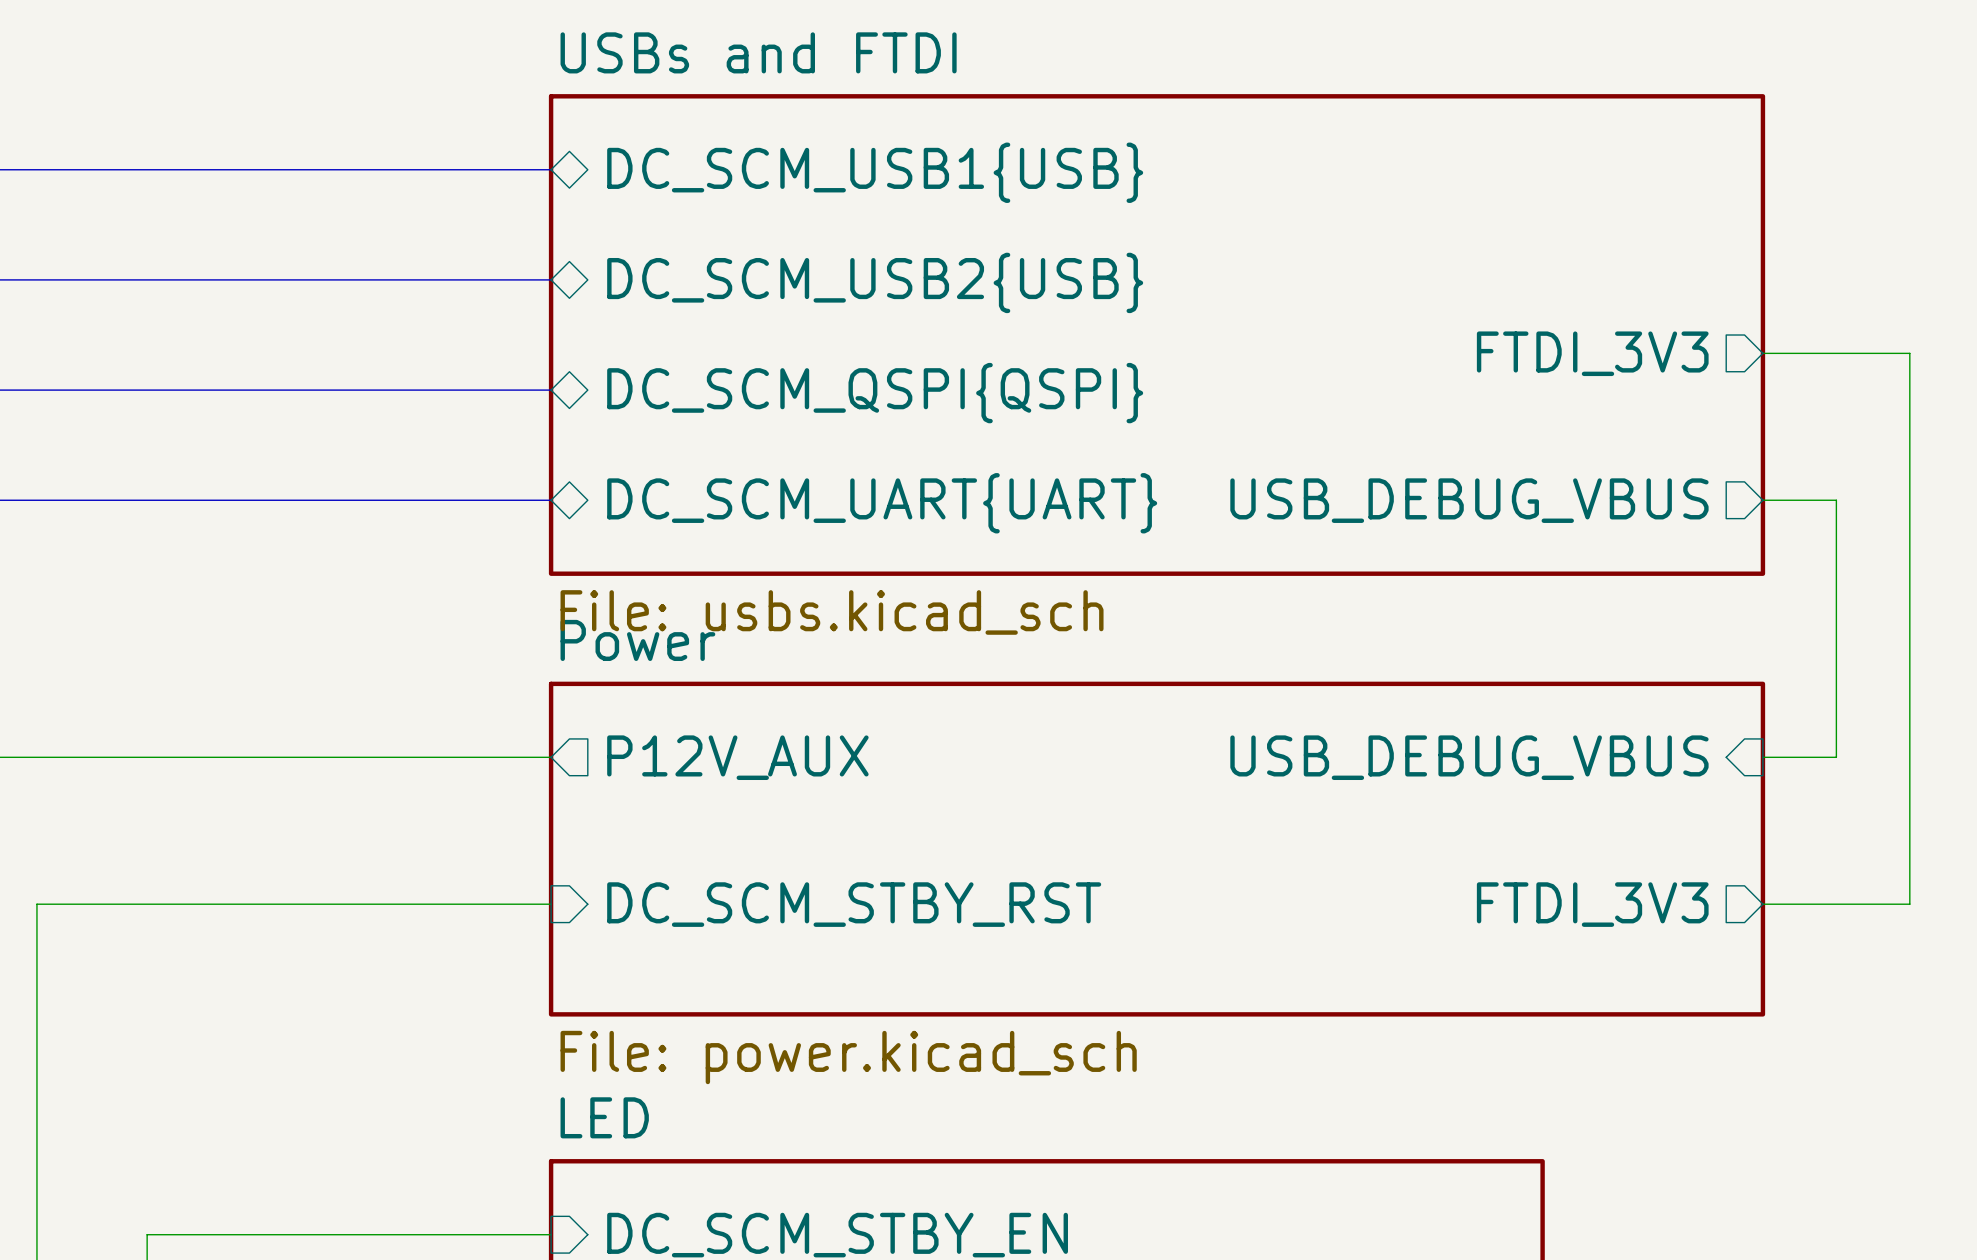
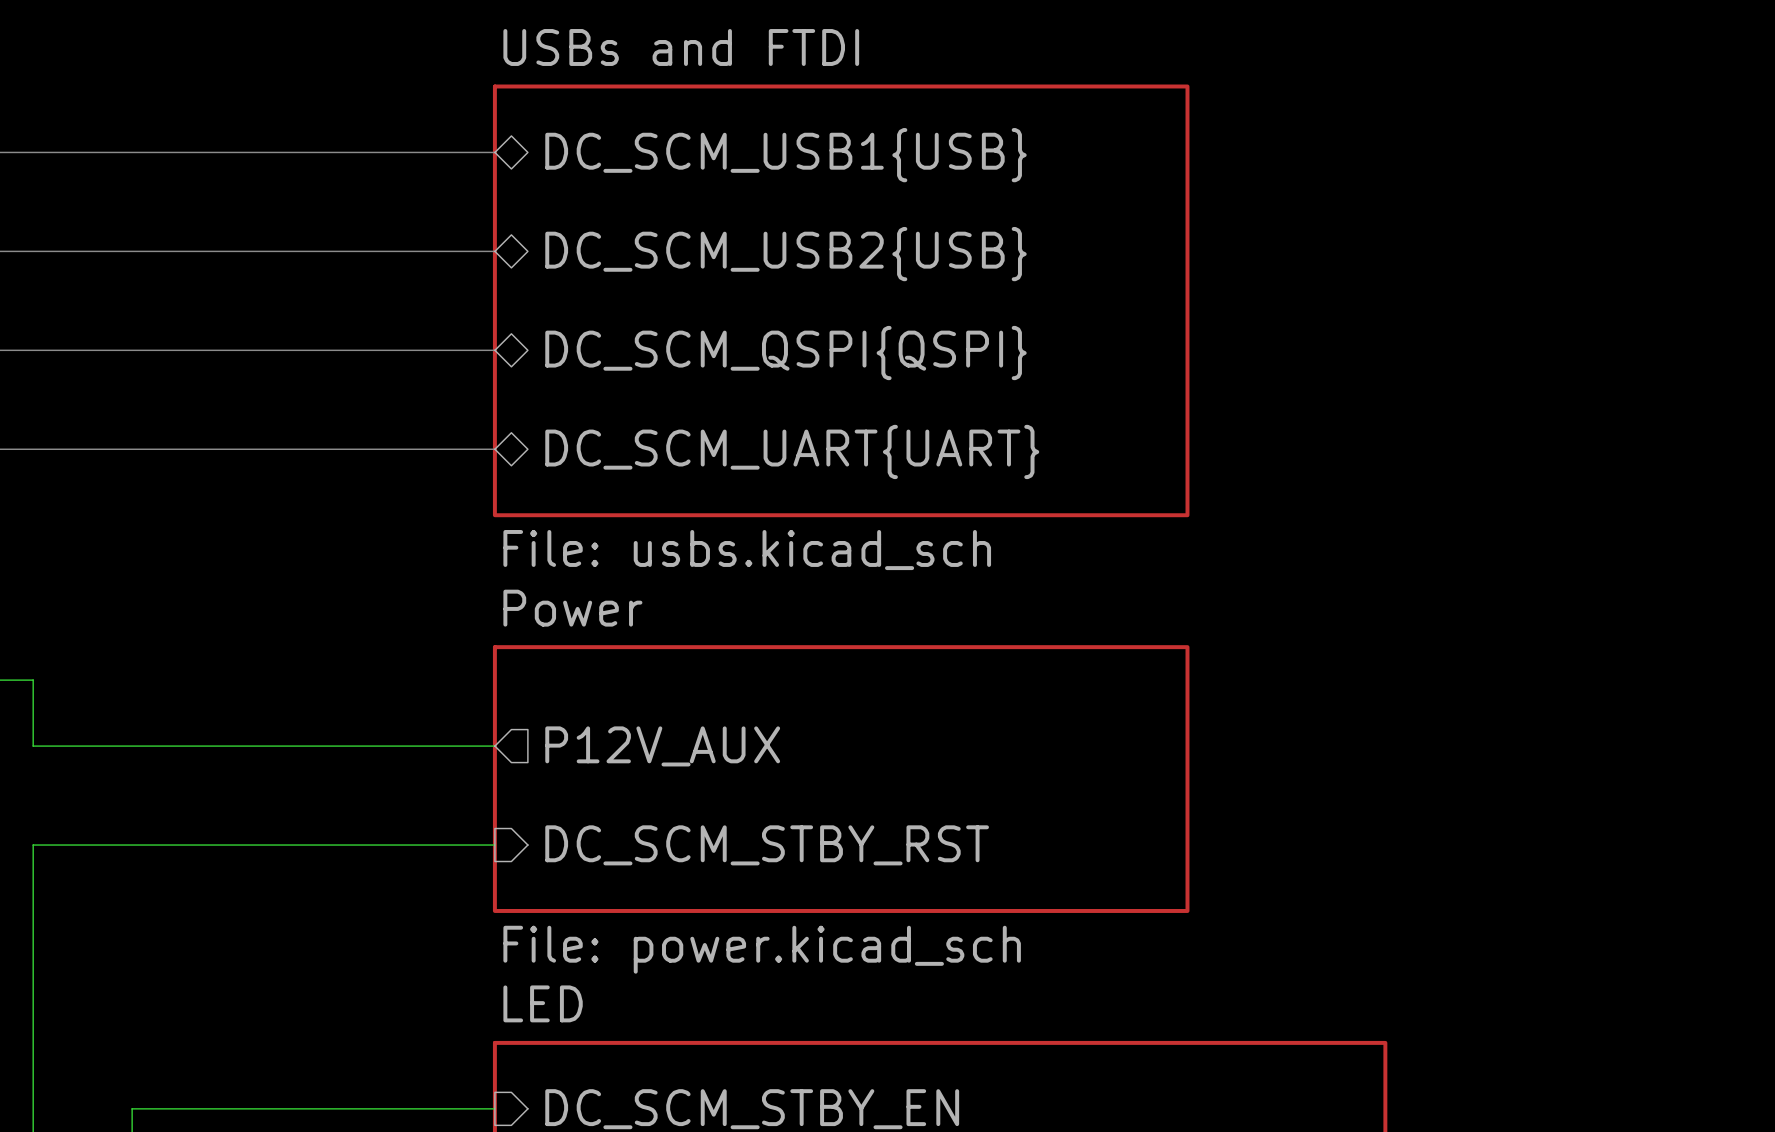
sheet USBs and FTDI: none -> File: usbs.kicad_sch (841, 300)
sheet USBs and FTDI: File: usbs.kicad_sch (1157, 335) -> none
sheet pin: FTDI_3V3 (1592, 353) -> none
wire: (1762, 353) (1909, 353) (1909, 904) (1762, 904) -> none
sheet pin: USB_DEBUG_VBUS (1469, 500) -> none
wire: (1762, 500) (1836, 500) (1836, 757) (1762, 757) -> none
wire: (36, 757) (551, 757) -> (33, 680) (33, 746) (494, 746)
sheet pin position: P12V_AUX (737, 757) -> P12V_AUX (662, 746)
sheet pin: USB_DEBUG_VBUS (1469, 757) -> none
sheet Power: File: power.kicad_sch (1157, 849) -> none
sheet Power: none -> File: power.kicad_sch (841, 779)
wire: (551, 904) (36, 904) (36, 940) -> (494, 845) (33, 845)
sheet pin position: DC_SCM_STBY_RST (854, 904) -> DC_SCM_STBY_RST (767, 845)
sheet pin: FTDI_3V3 (1592, 904) -> none

